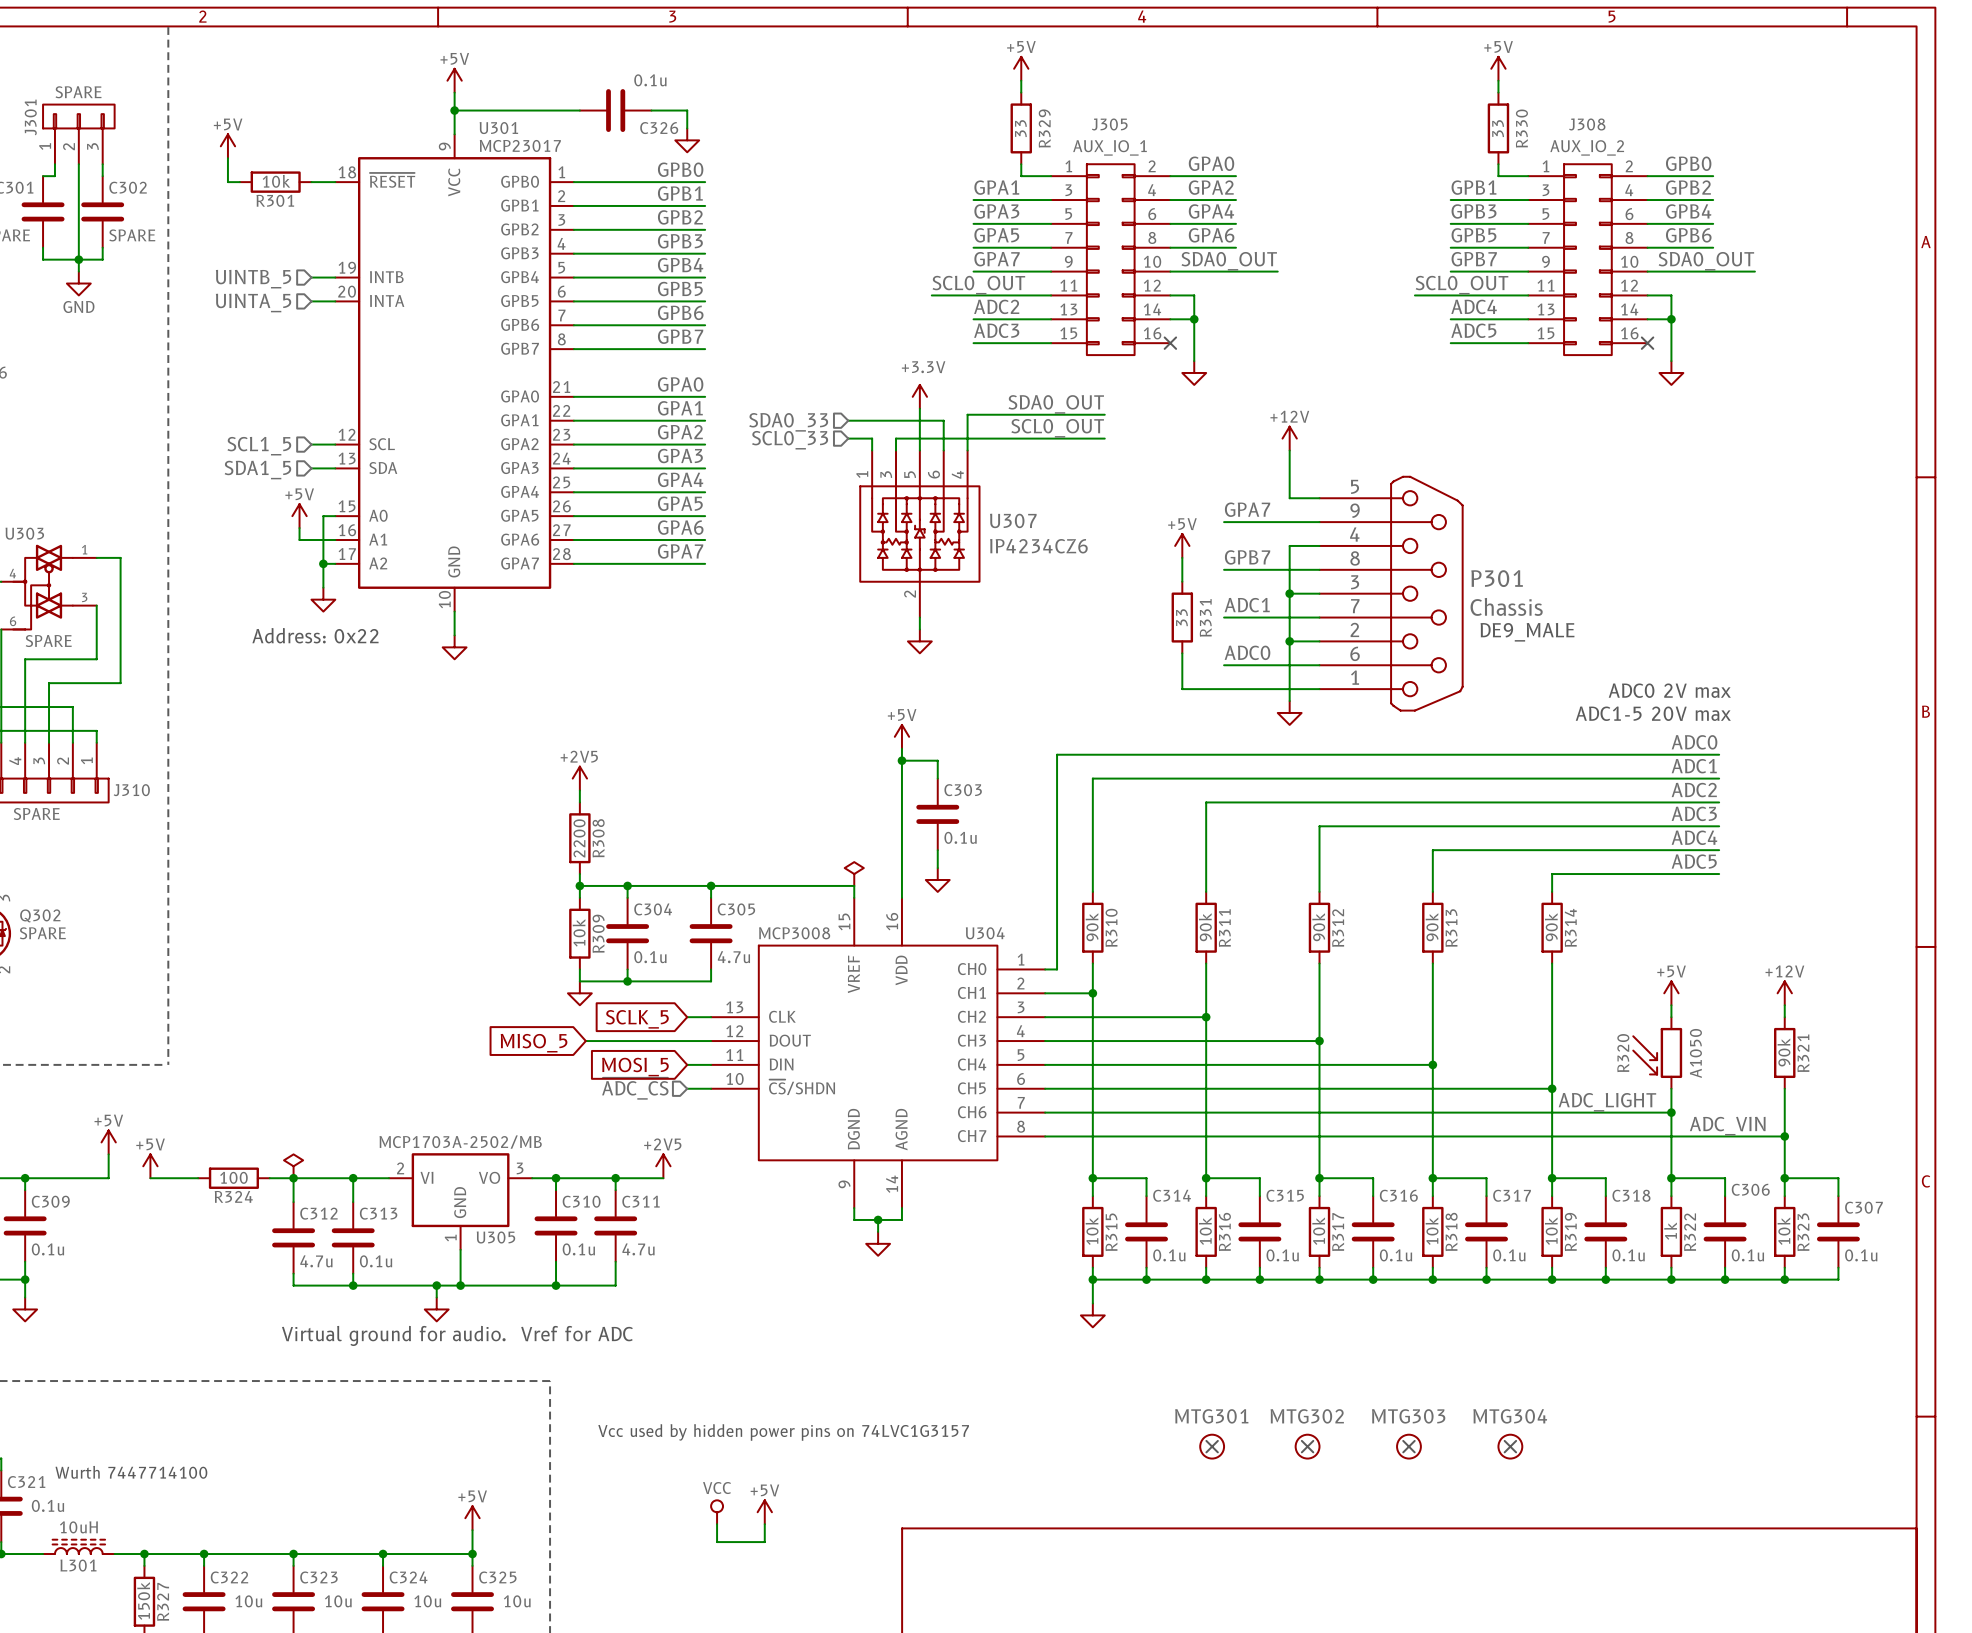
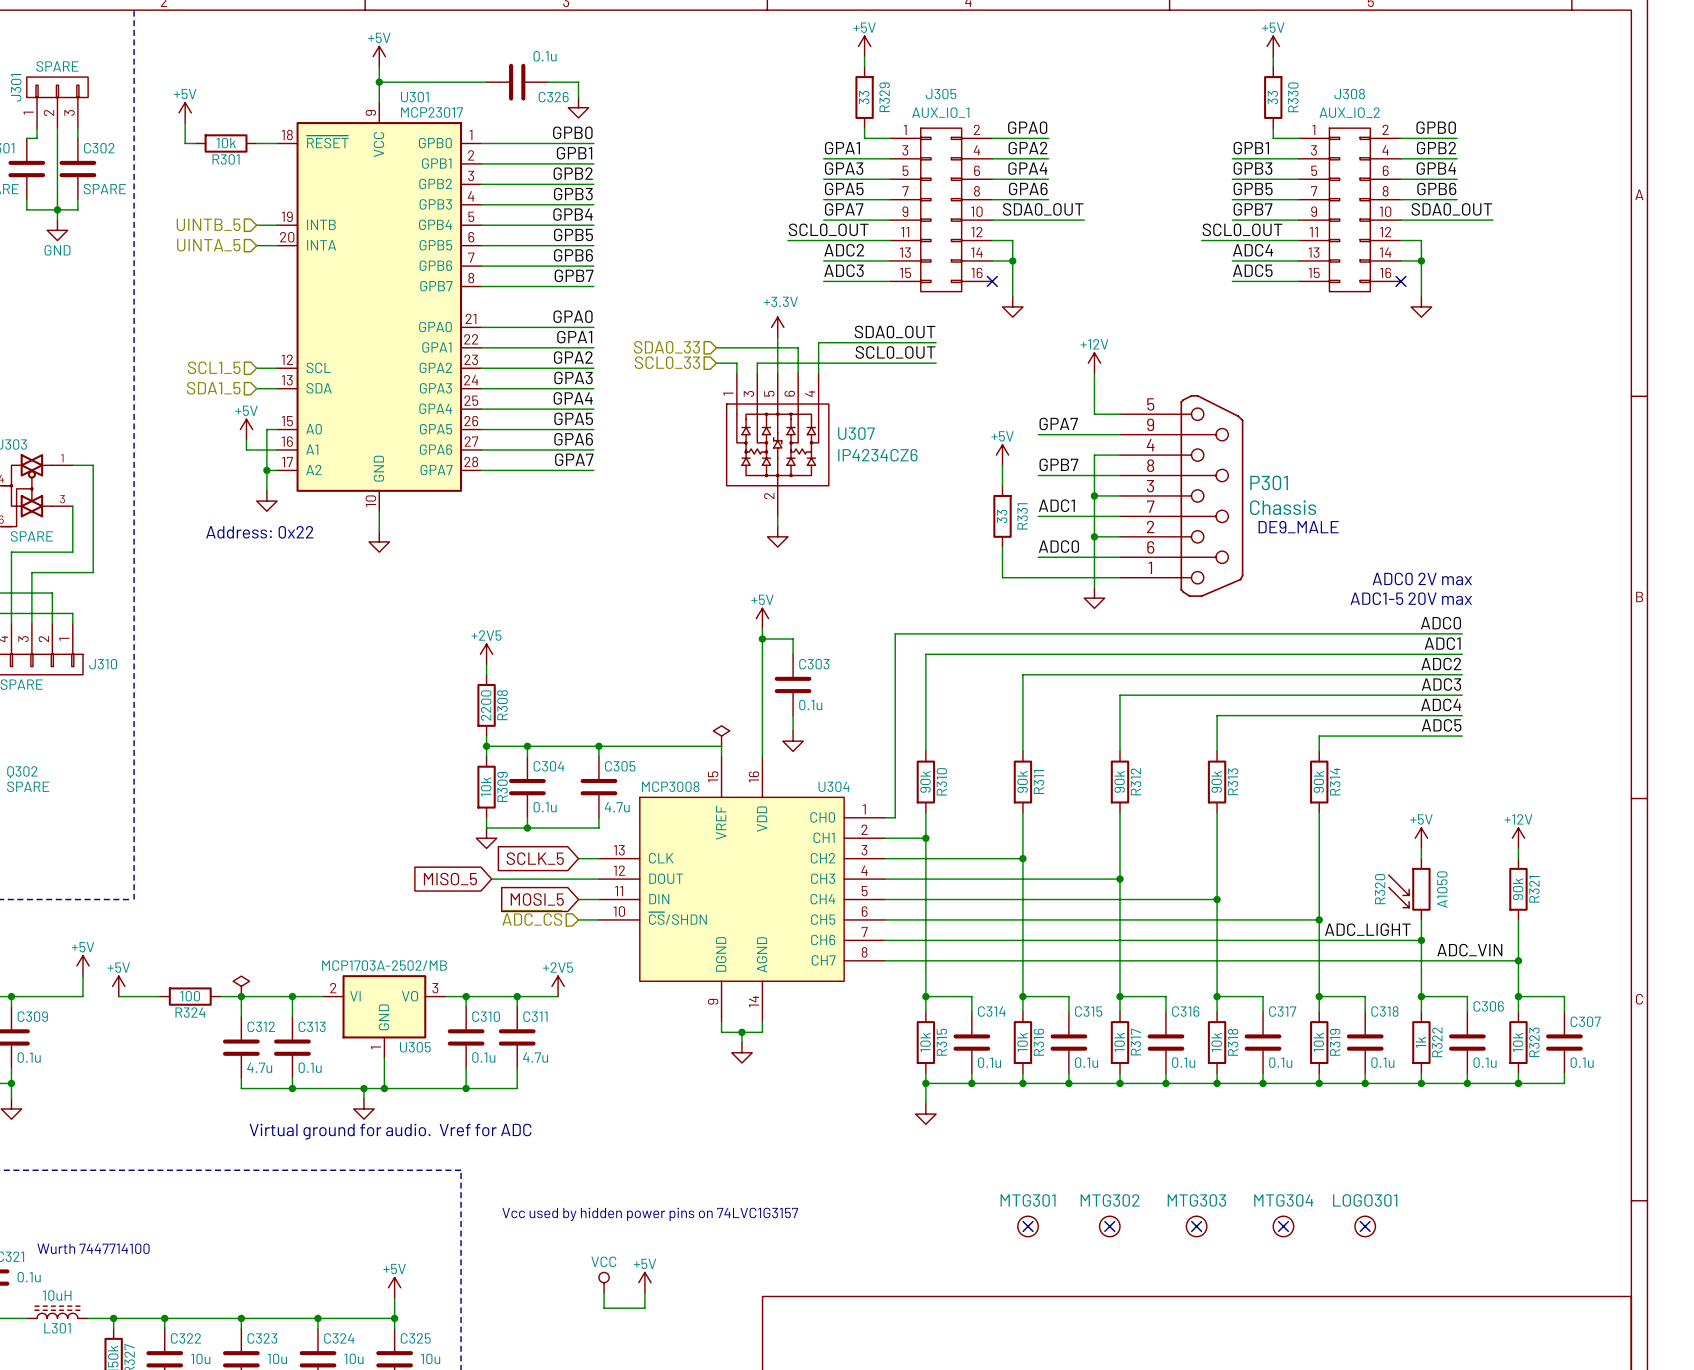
LOGO301: none -> (1365, 1226)
no-connect mark: none -> (1365, 1226)

